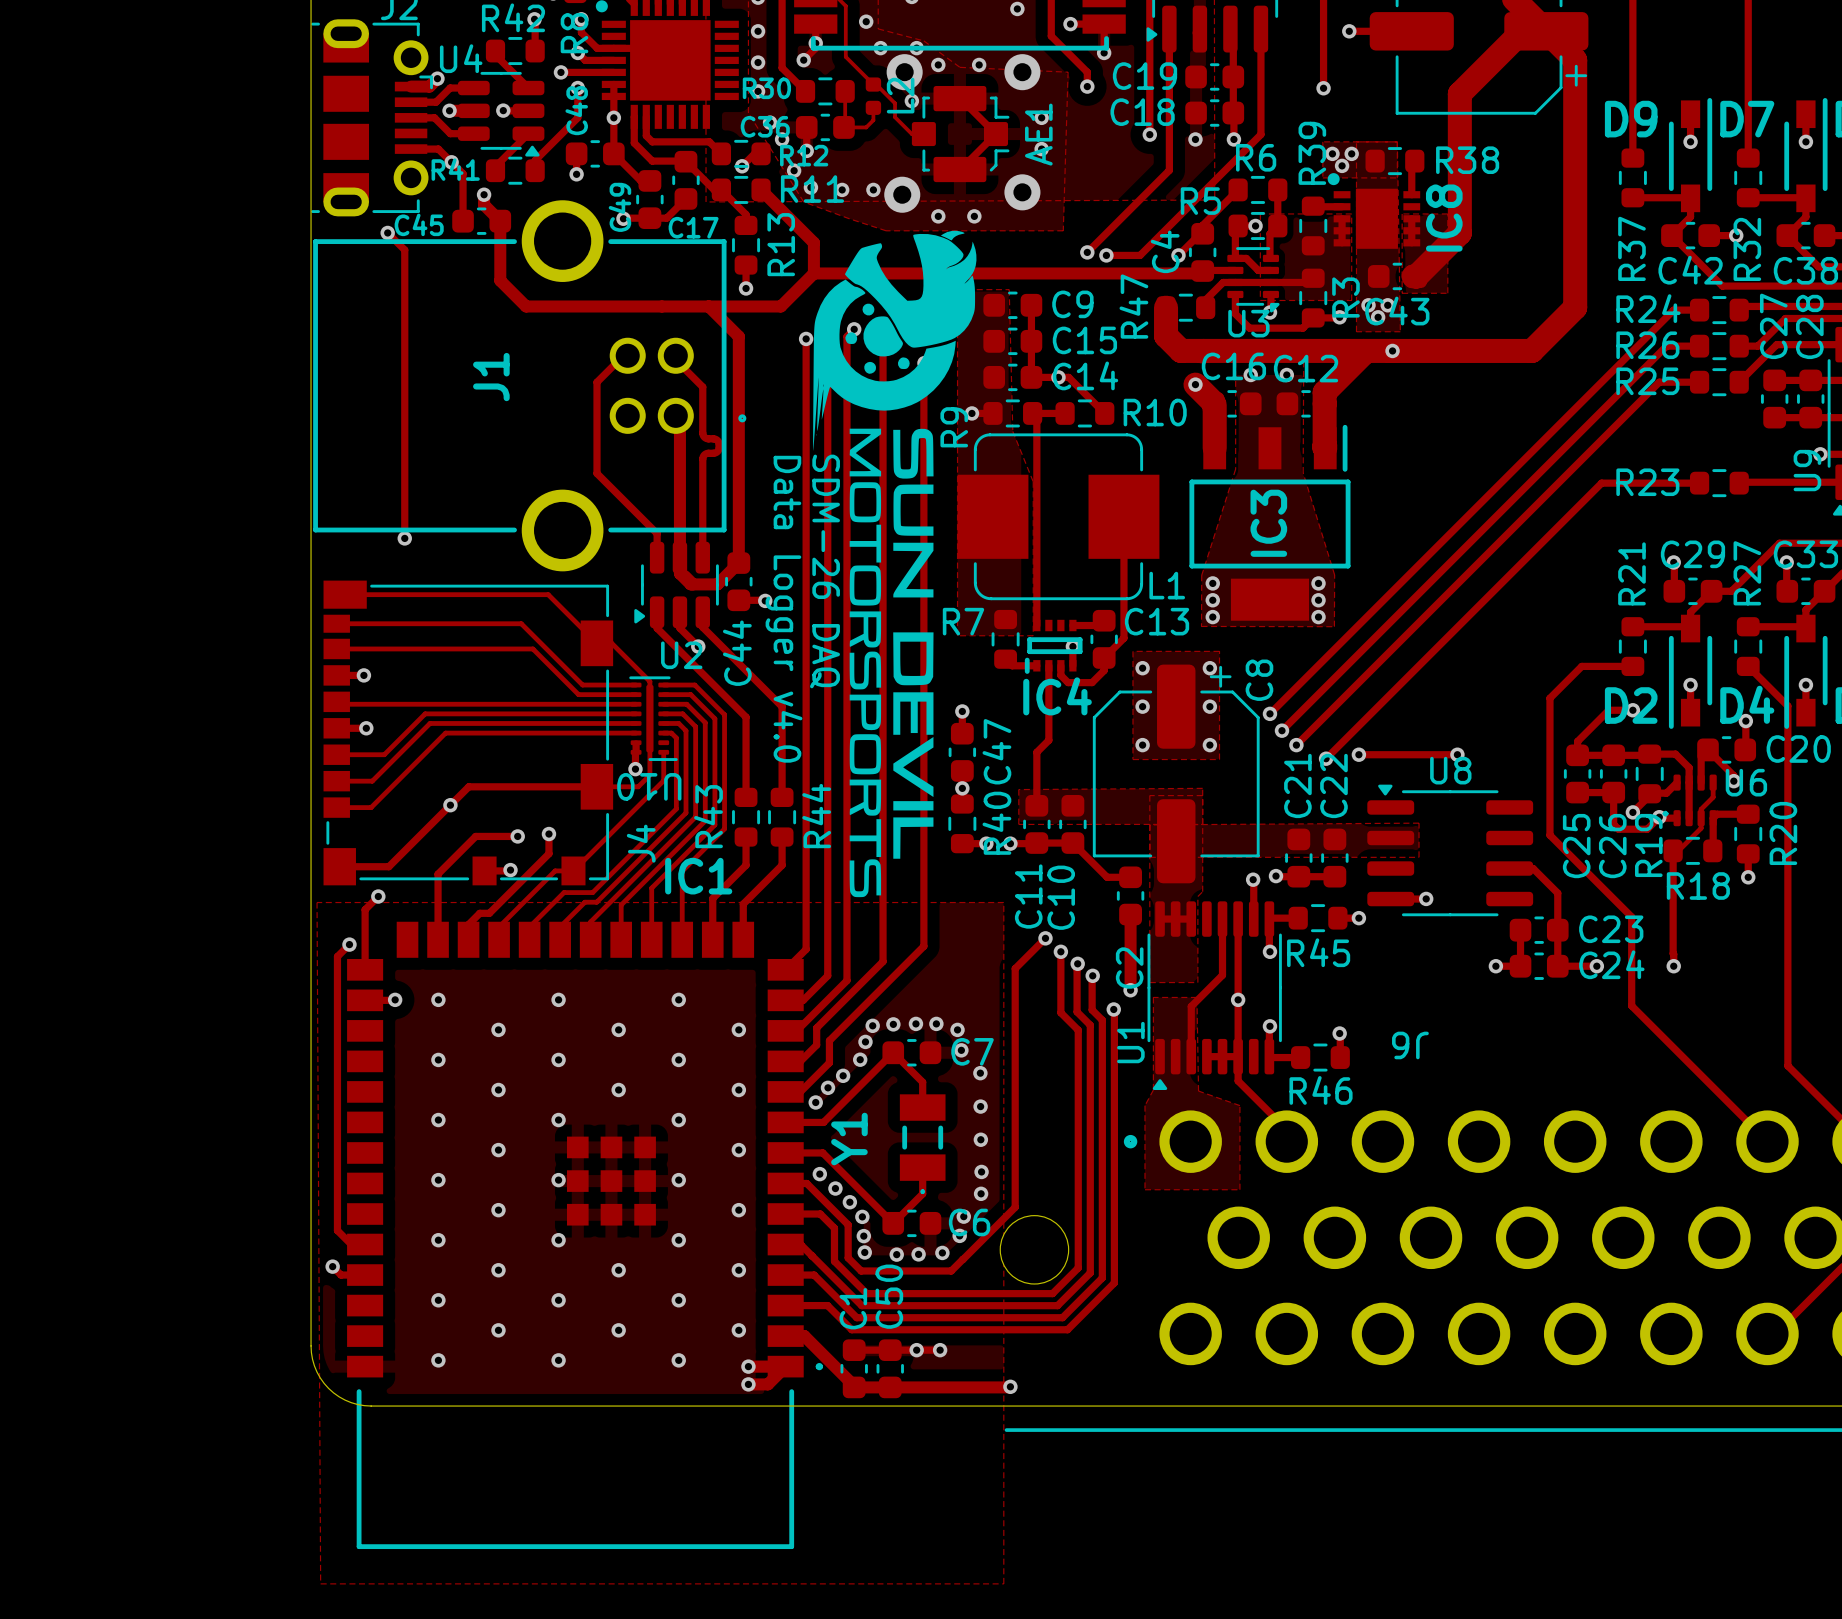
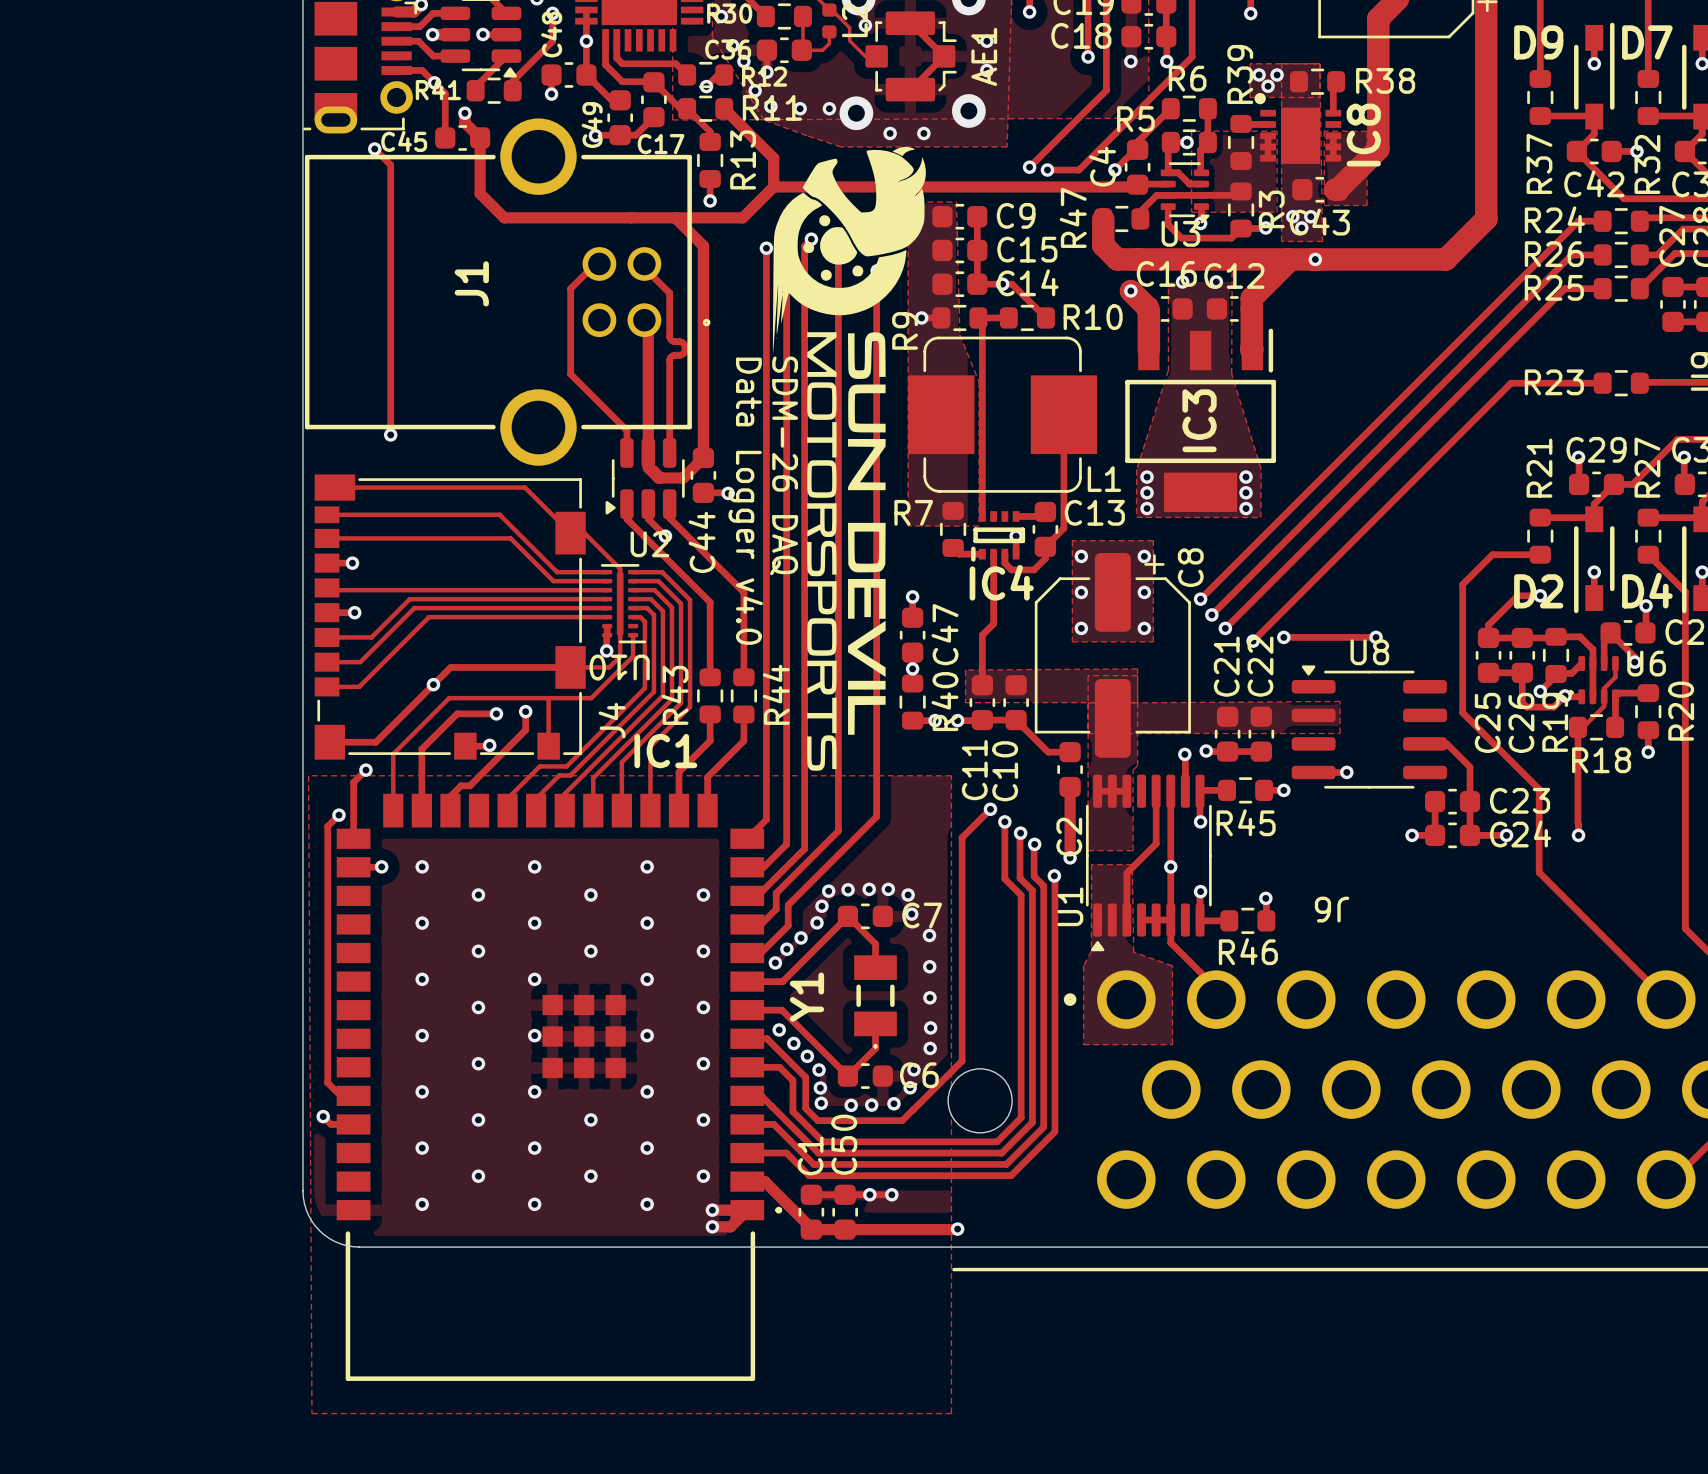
track: (663, 774) (663, 780) (573, 870) (555, 870) (499, 926) (499, 939) -> (633, 656) (591, 698) (449, 698) (393, 754) (393, 810)
track: none -> (548, 698) (548, 746)

